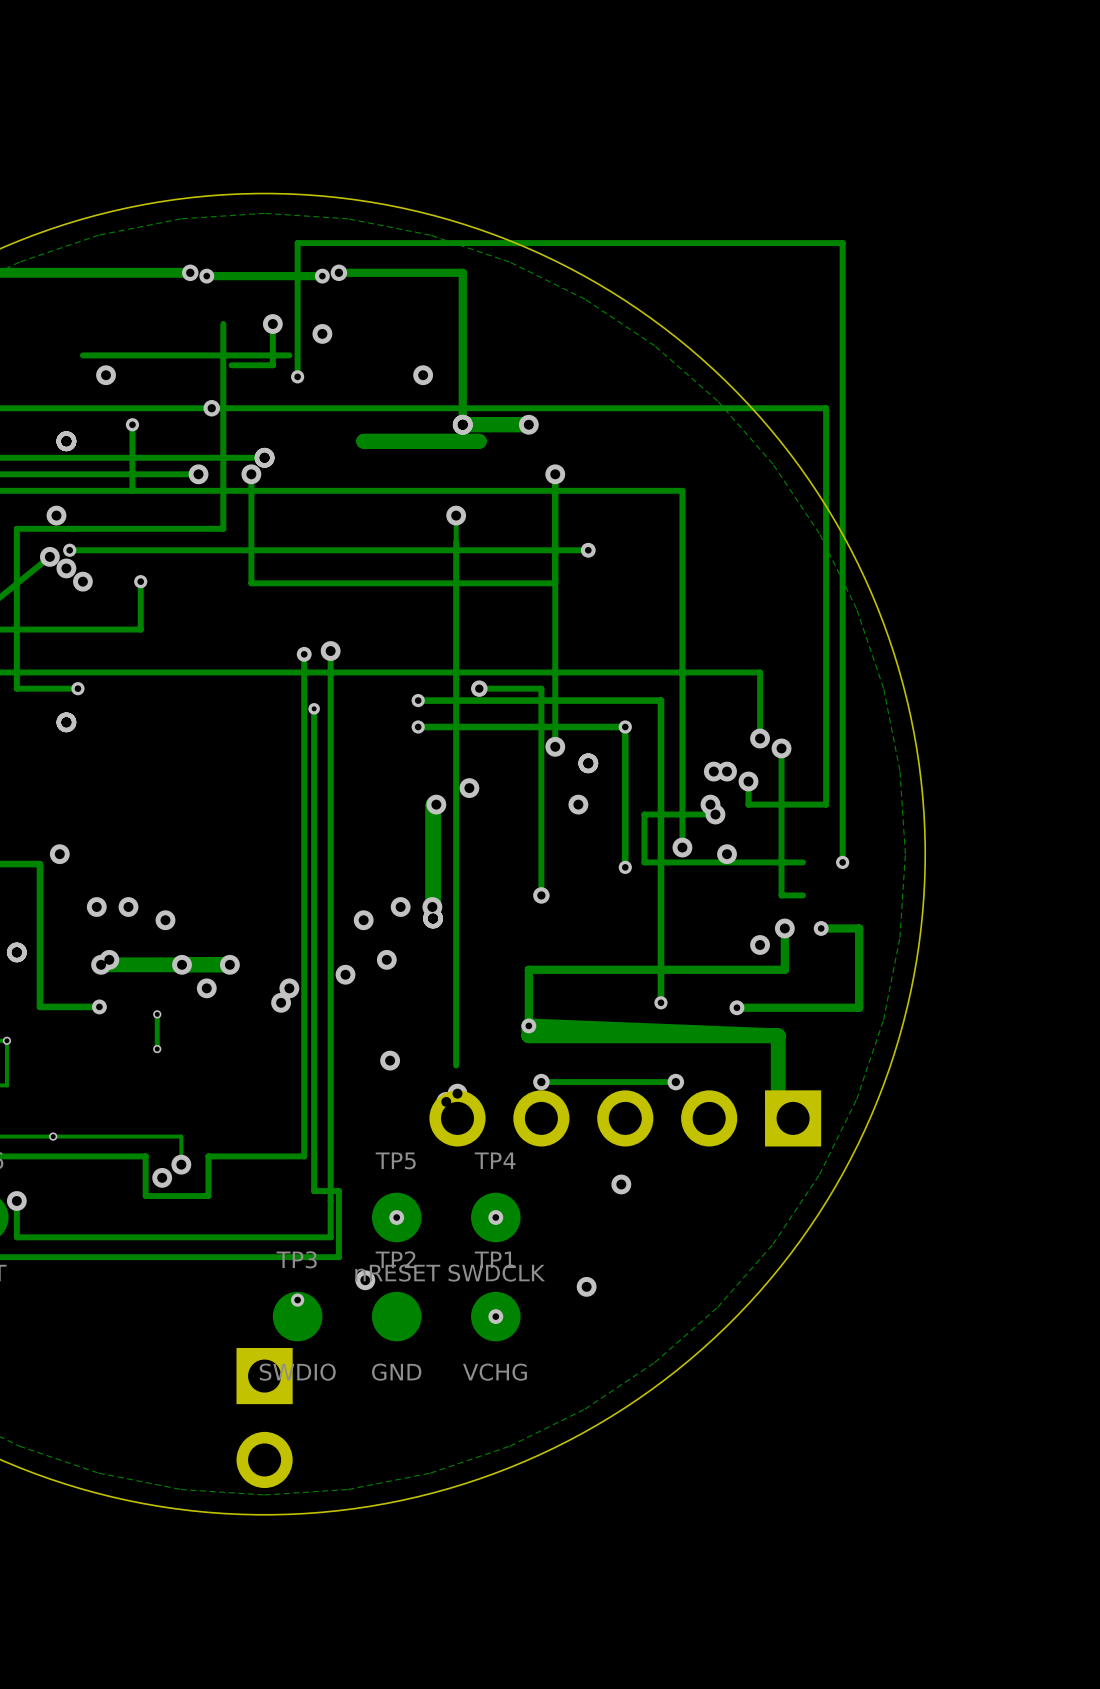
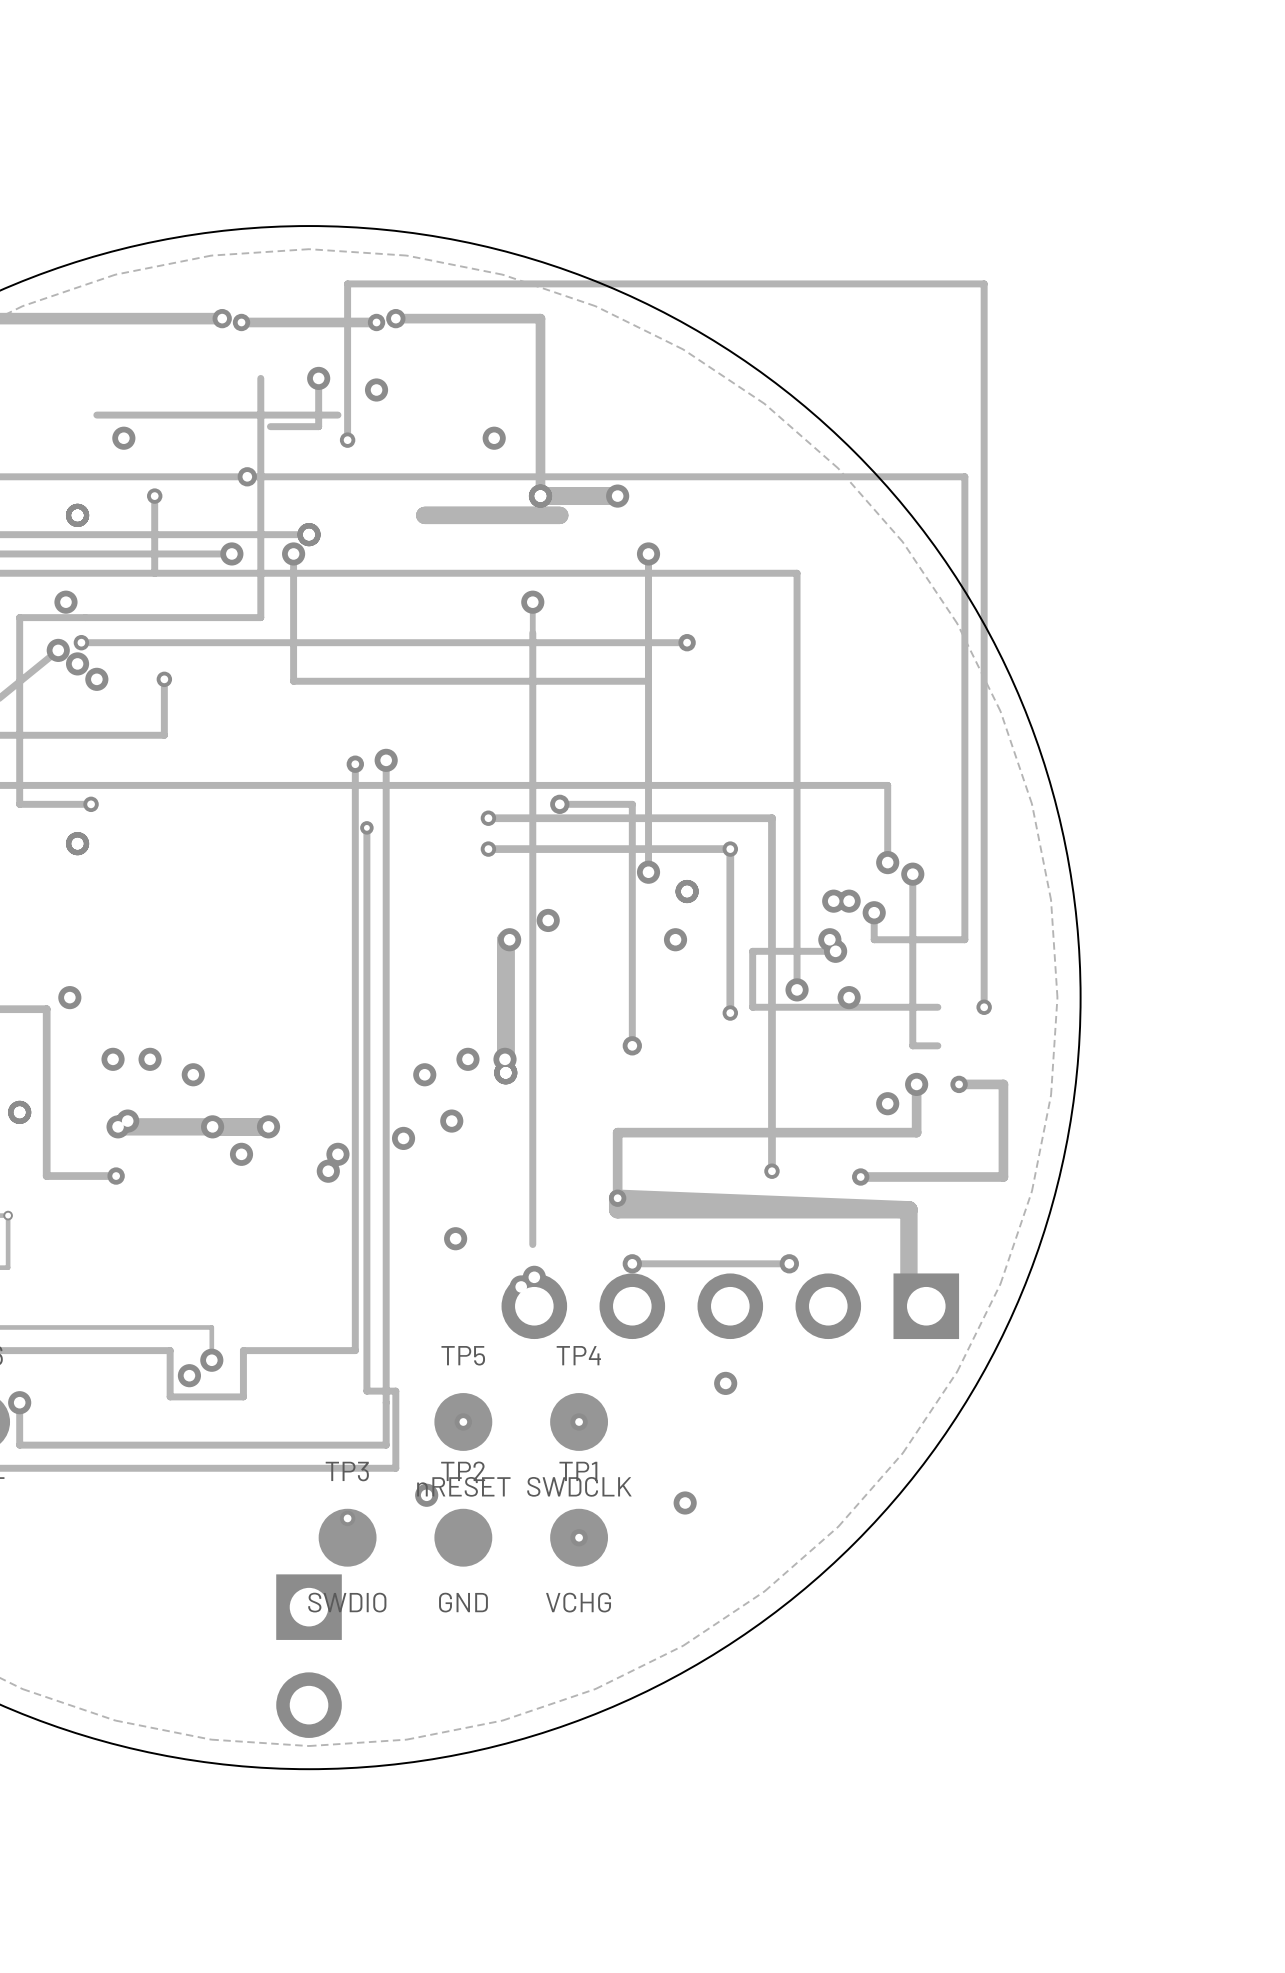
track: (157, 1014) (157, 1049) -> none
via: (157, 1014) -> none
via: (157, 1049) -> none
via: (53, 1136) -> none

